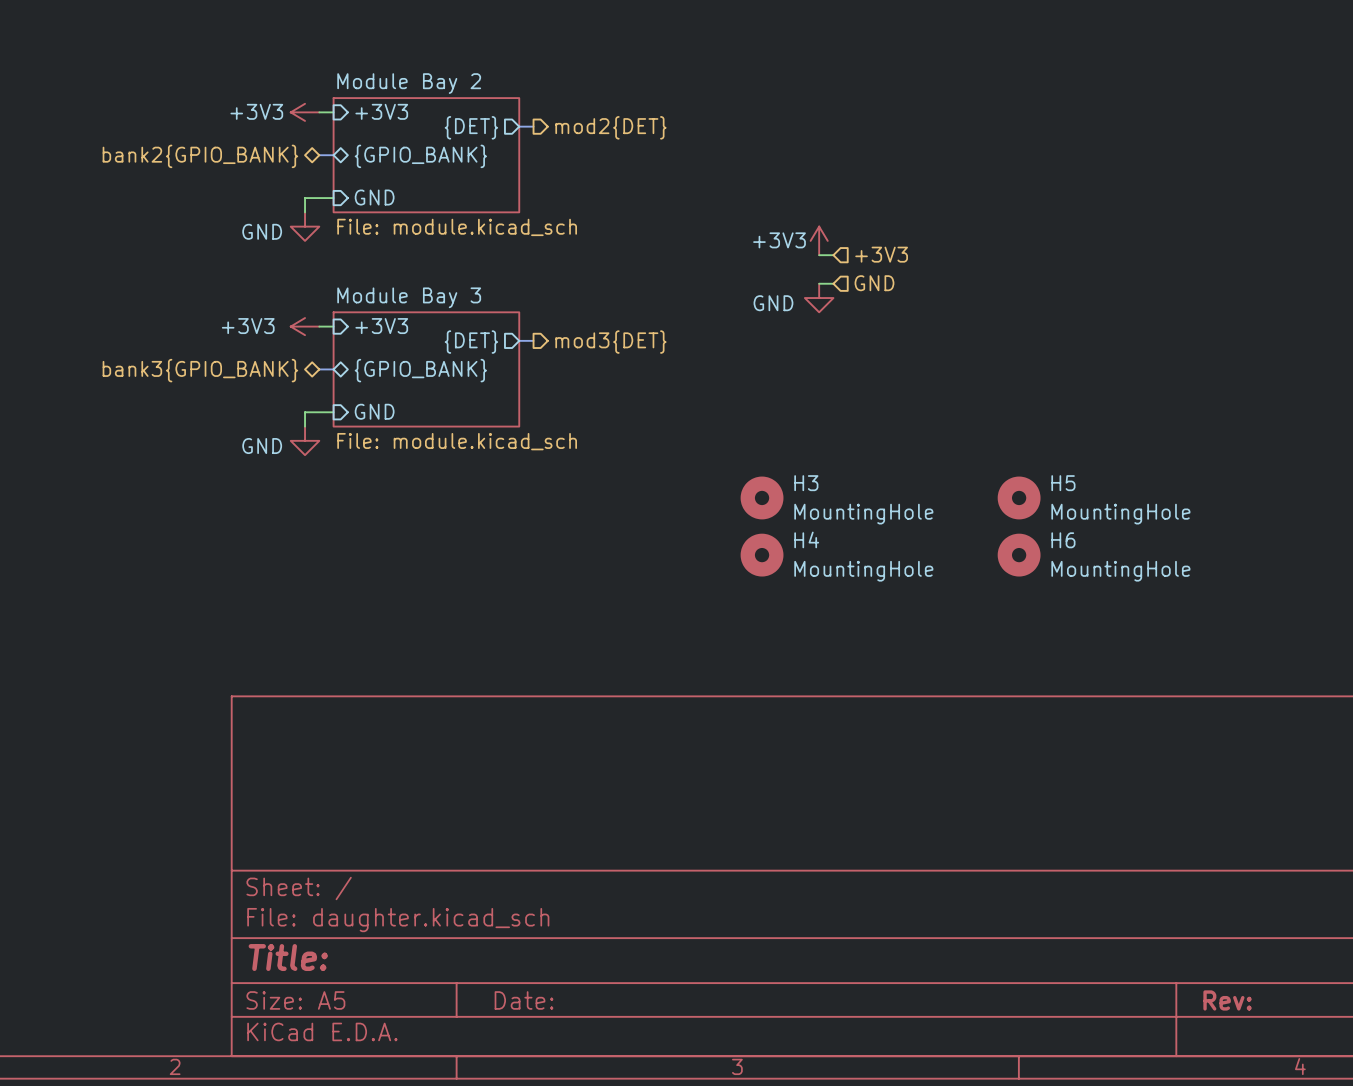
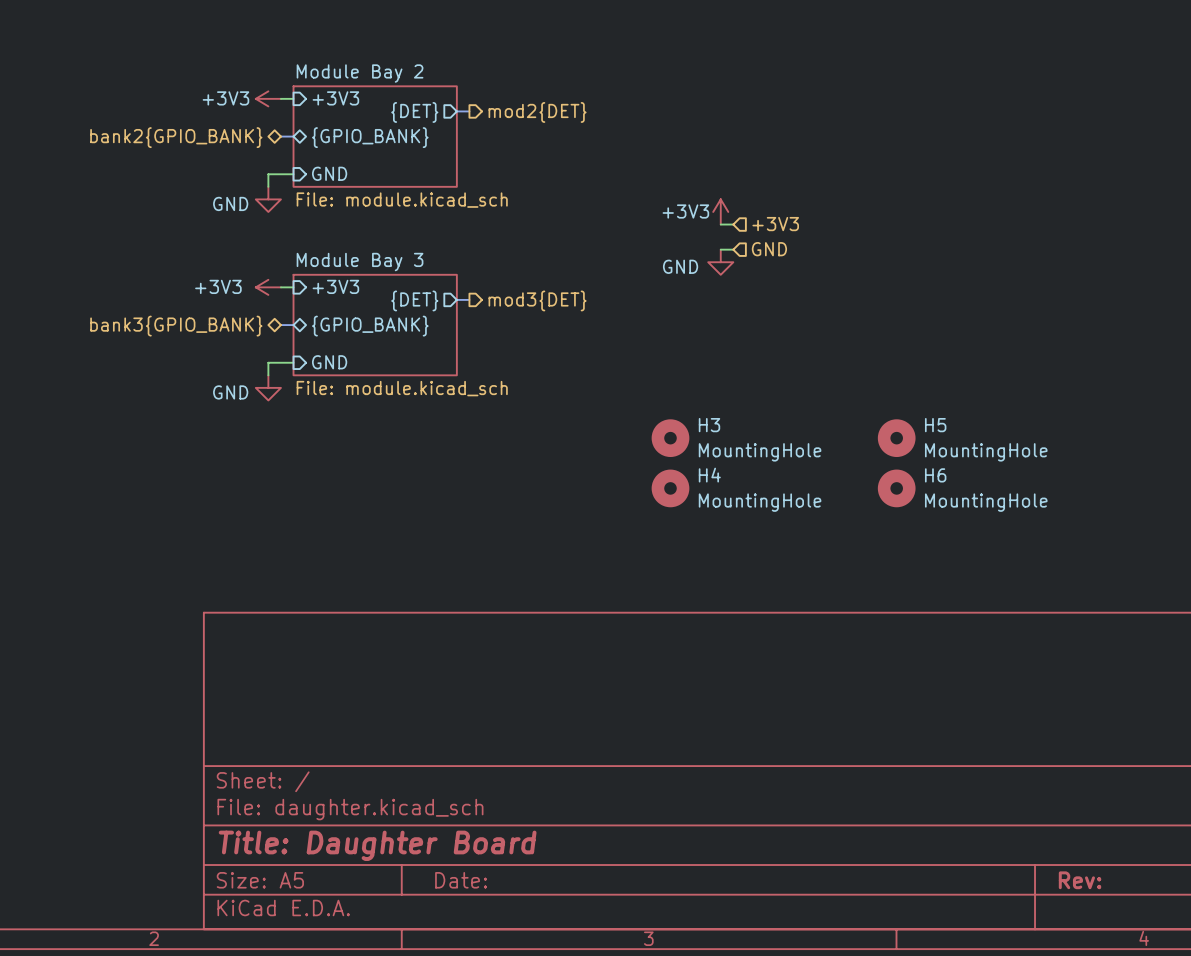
title block: Title: (288, 957) -> Title: Daughter Board (377, 845)

